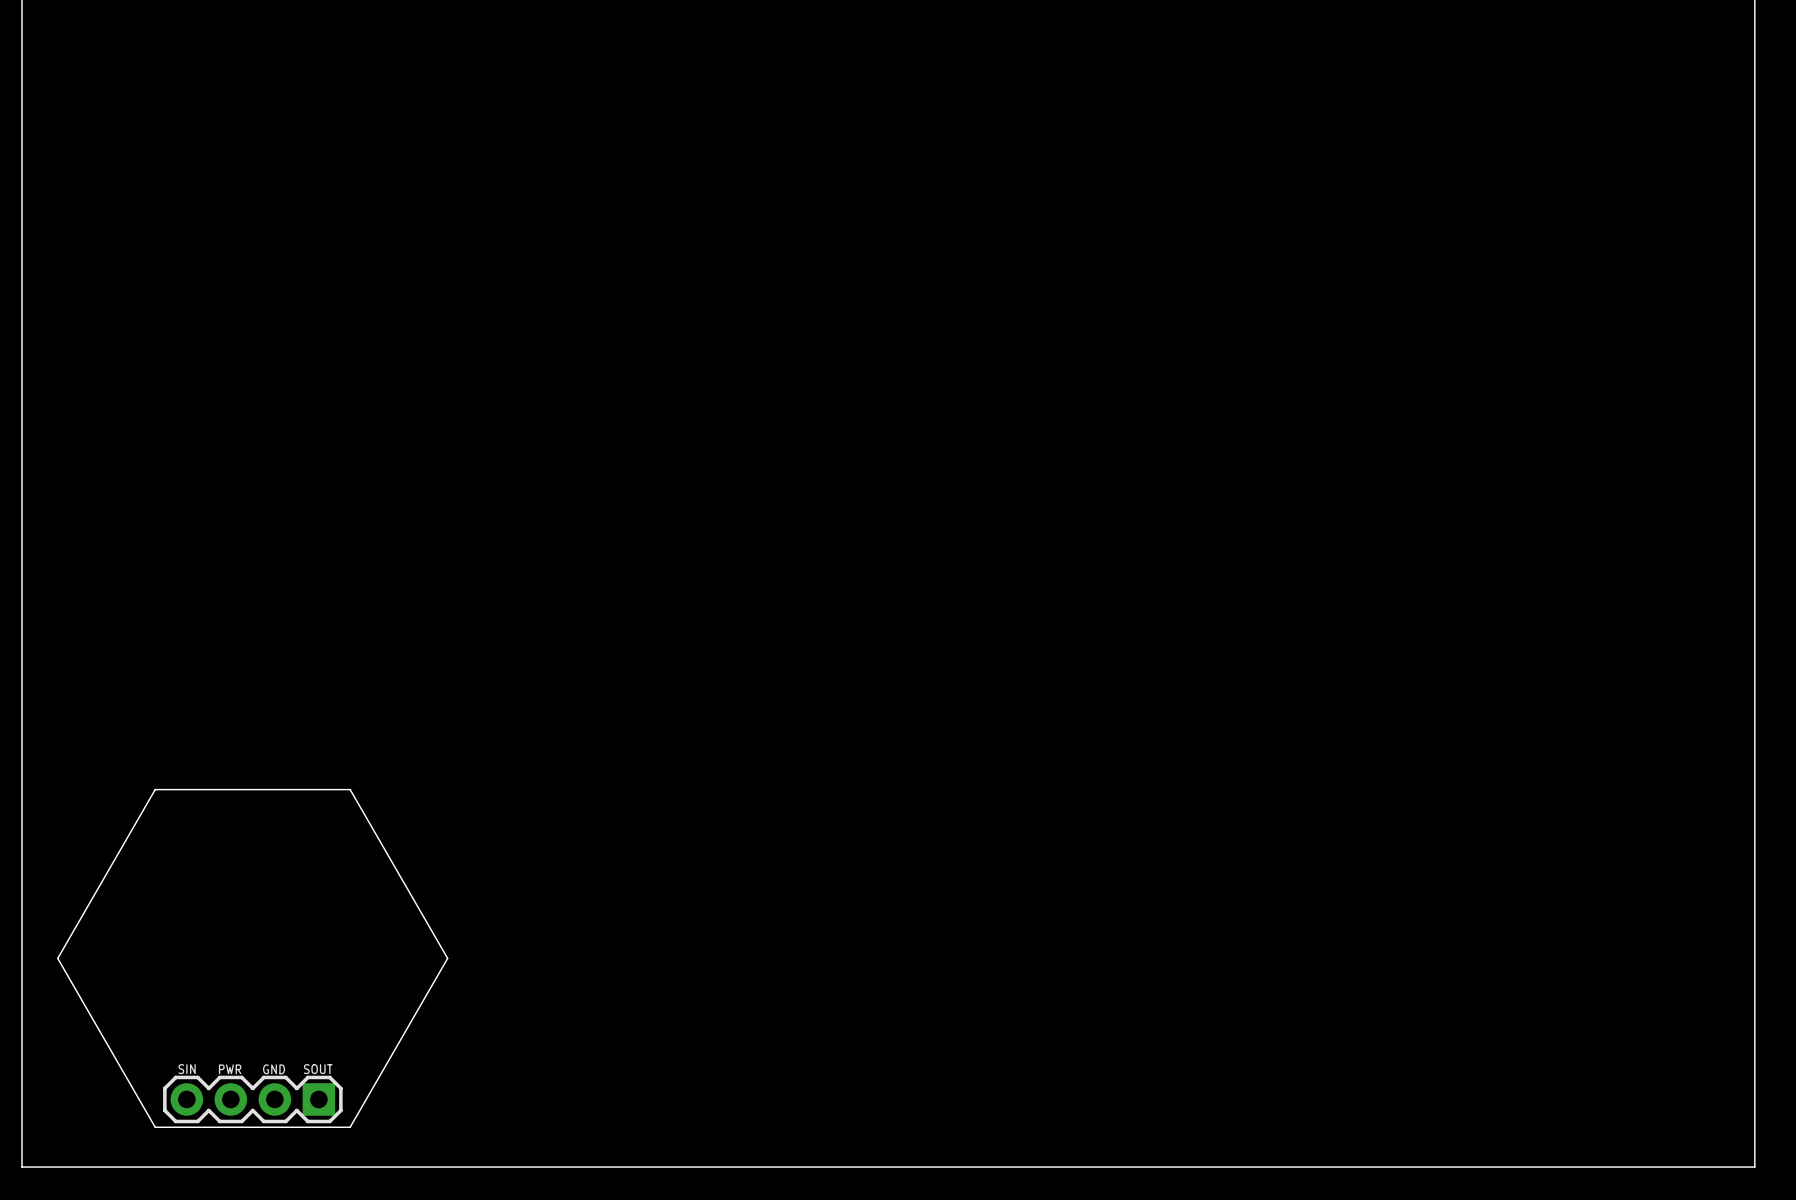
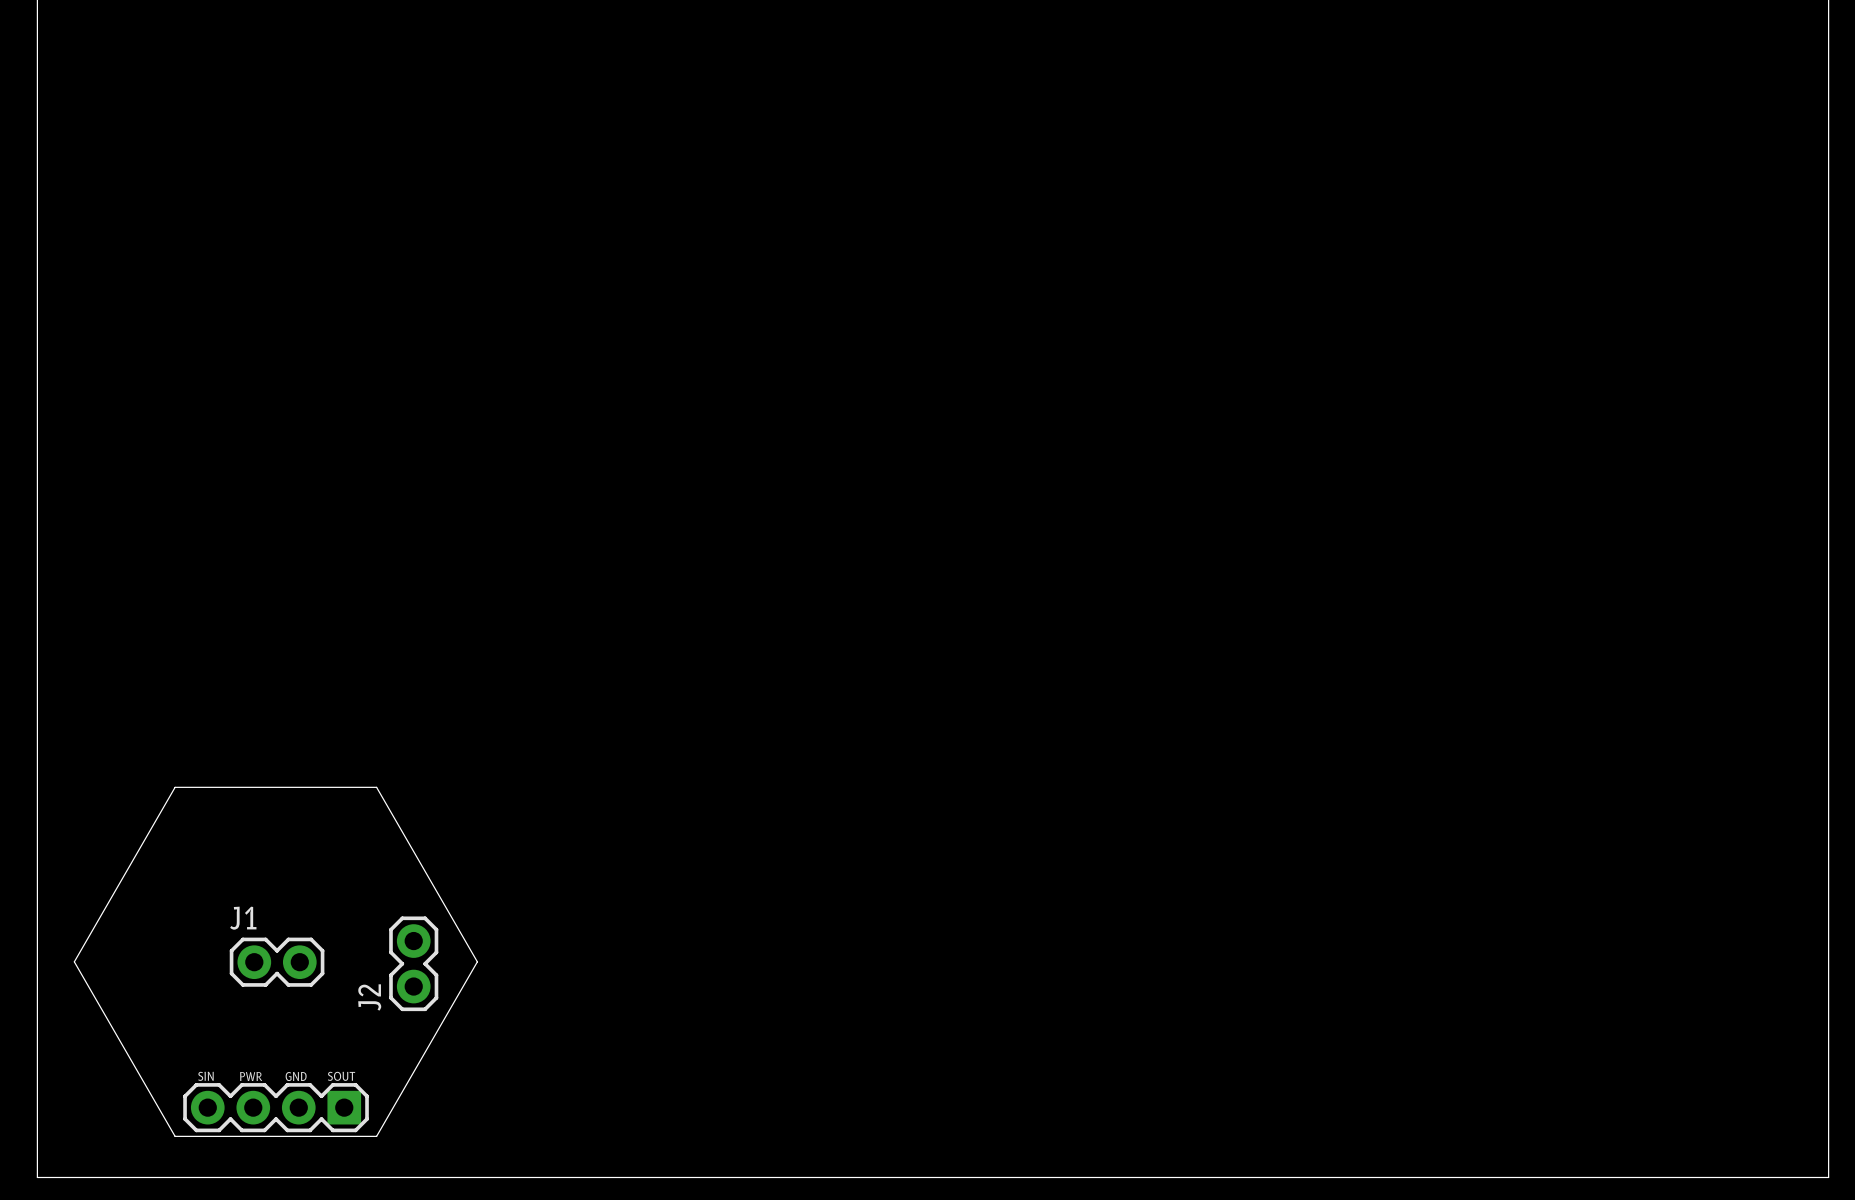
J1: none -> (277, 962)
J2: none -> (413, 963)

